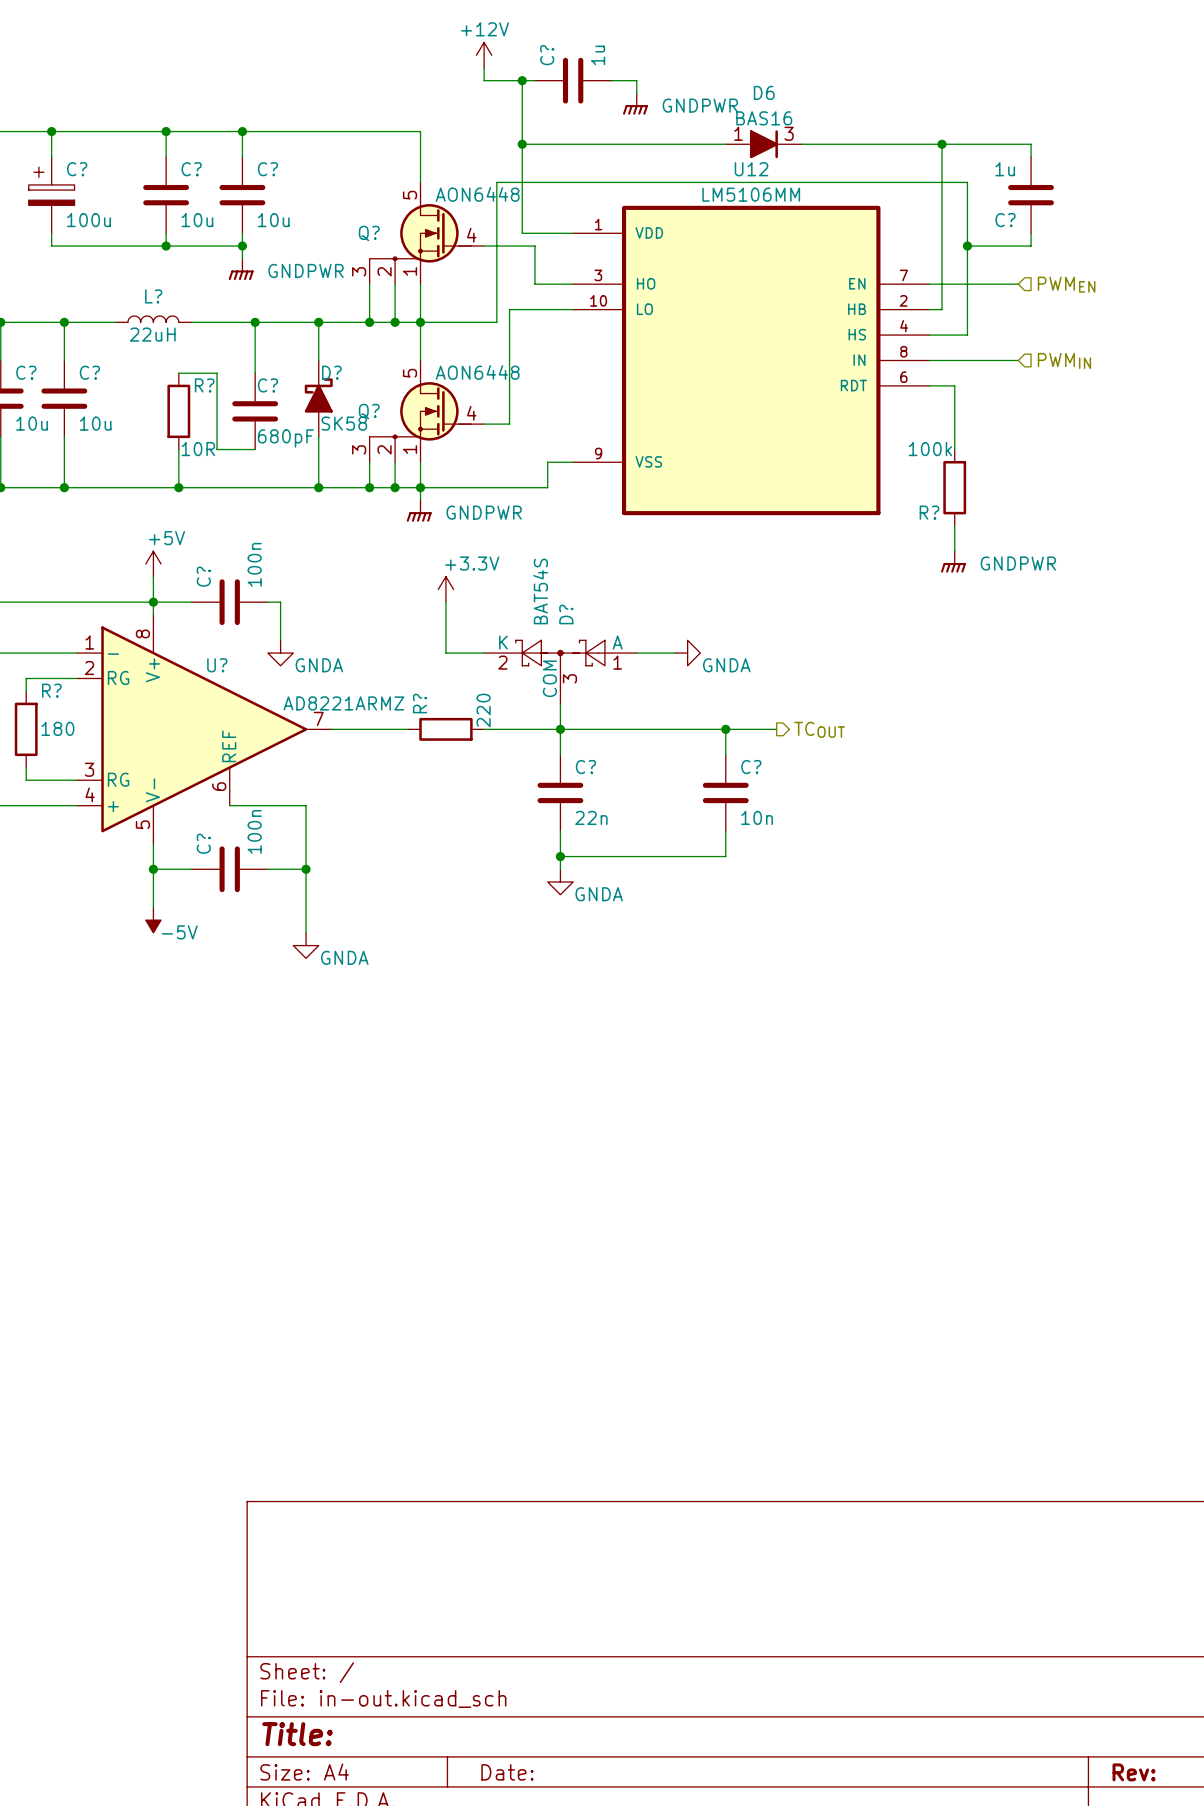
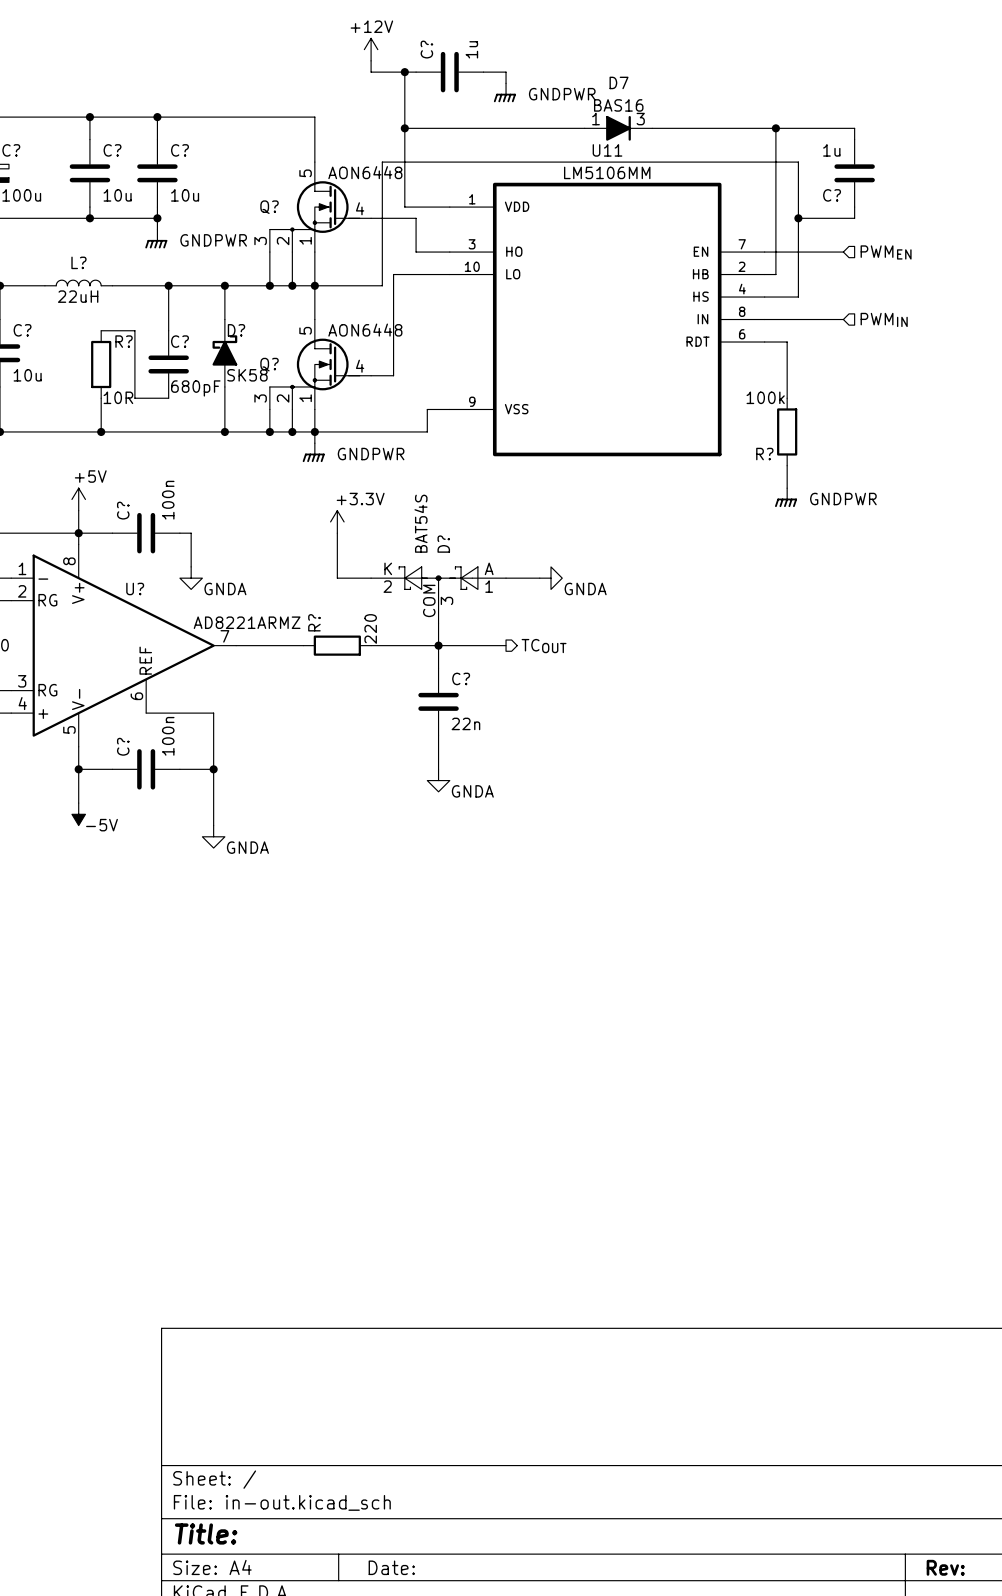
D6 name: D6 (764, 92) -> D7 (619, 82)
U12 name: U12 (751, 169) -> U11 (607, 150)
wire: (636, 729) (776, 729) -> none
wire: (725, 729) (725, 754) -> none
junction: (725, 729) -> none
hierarchical label position: TCOUT (819, 729) -> TCOUT (544, 646)
C?: 10n (725, 792) -> none
wire: (725, 831) (725, 856) (560, 856) -> none
junction: (560, 856) -> none

